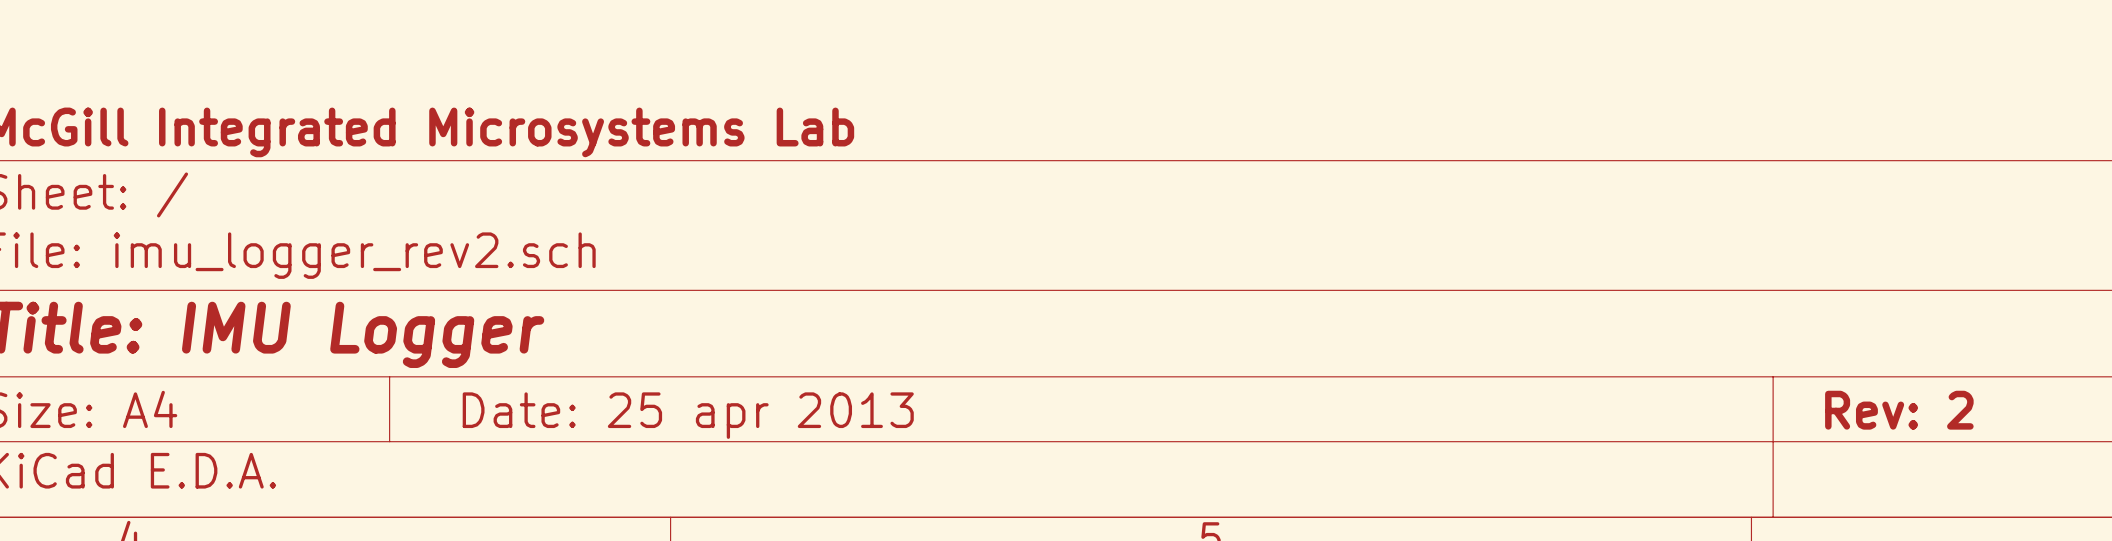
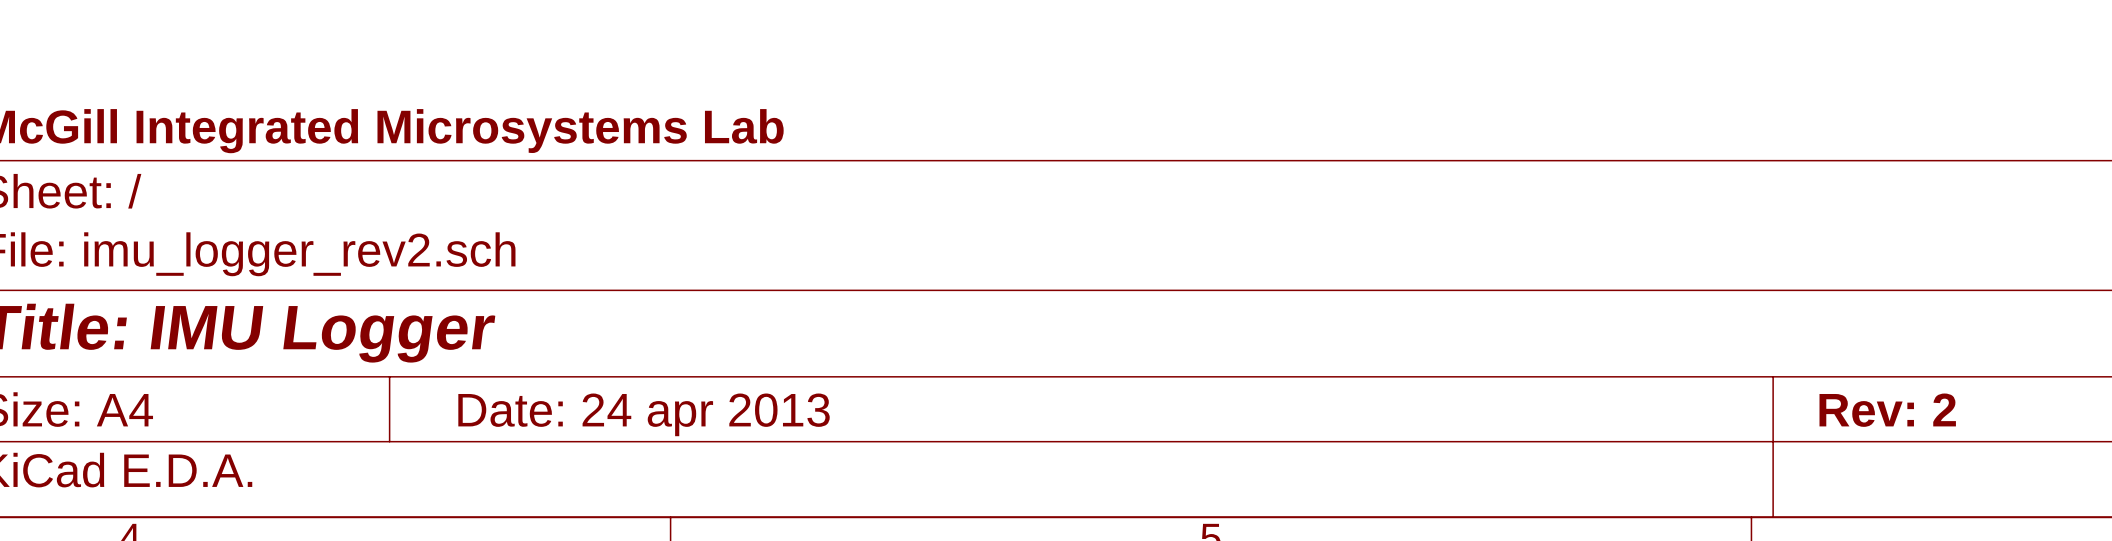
title block: Date: 25 apr 2013 (688, 415) -> Date: 24 apr 2013 (644, 414)

